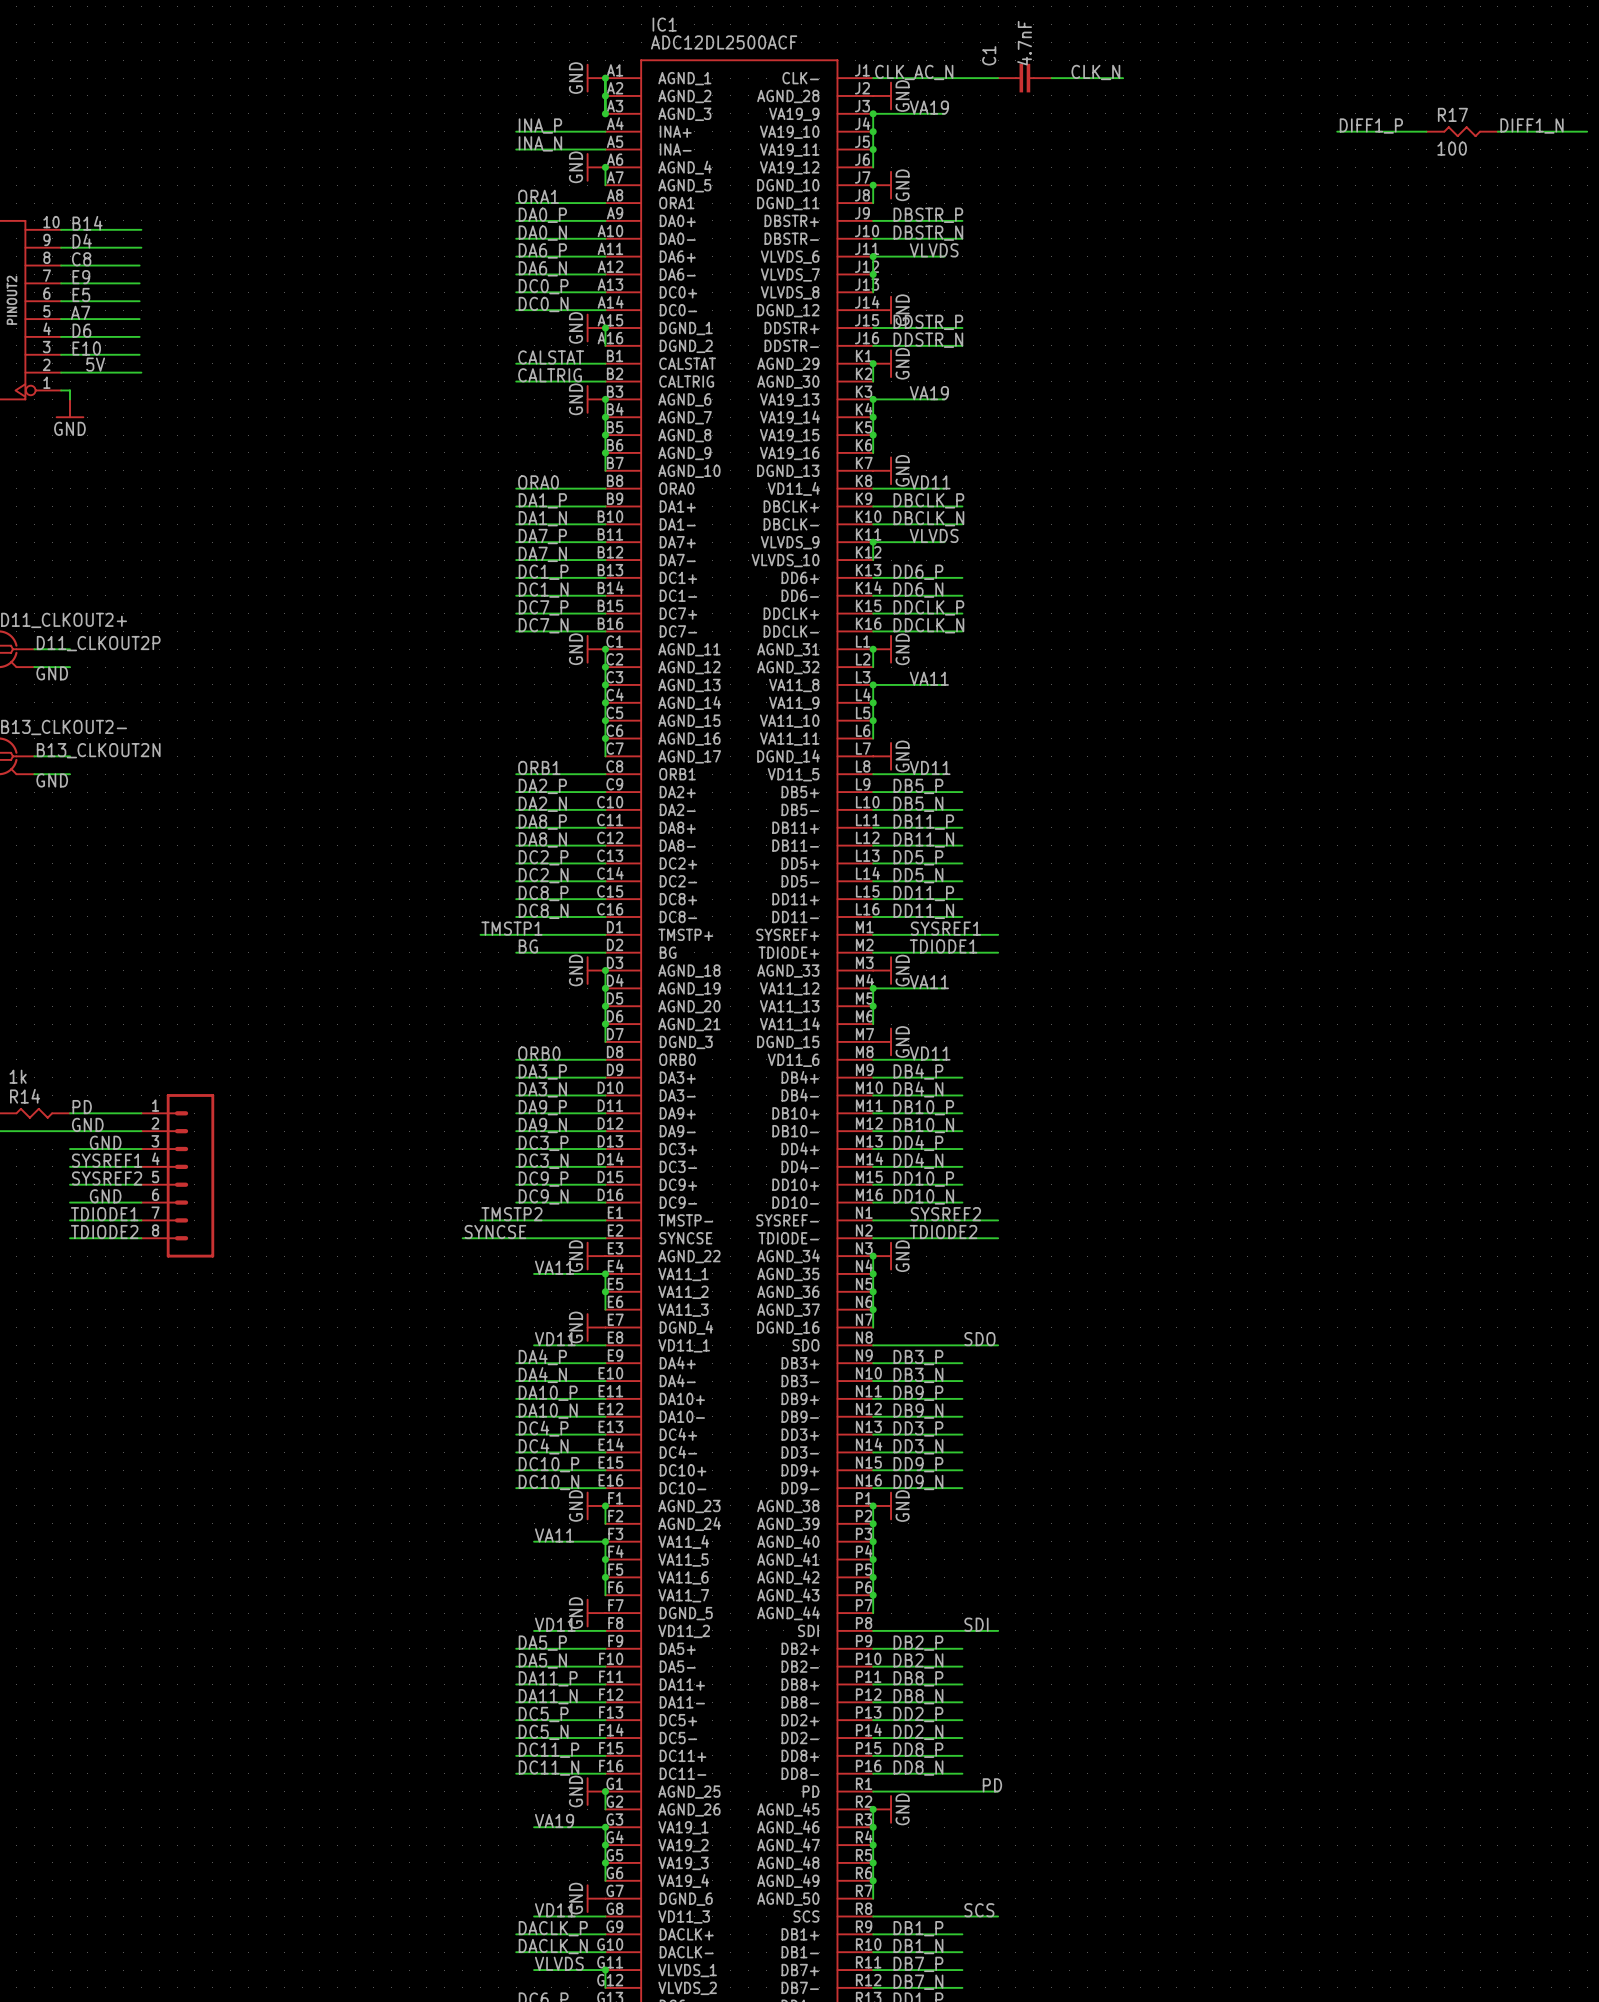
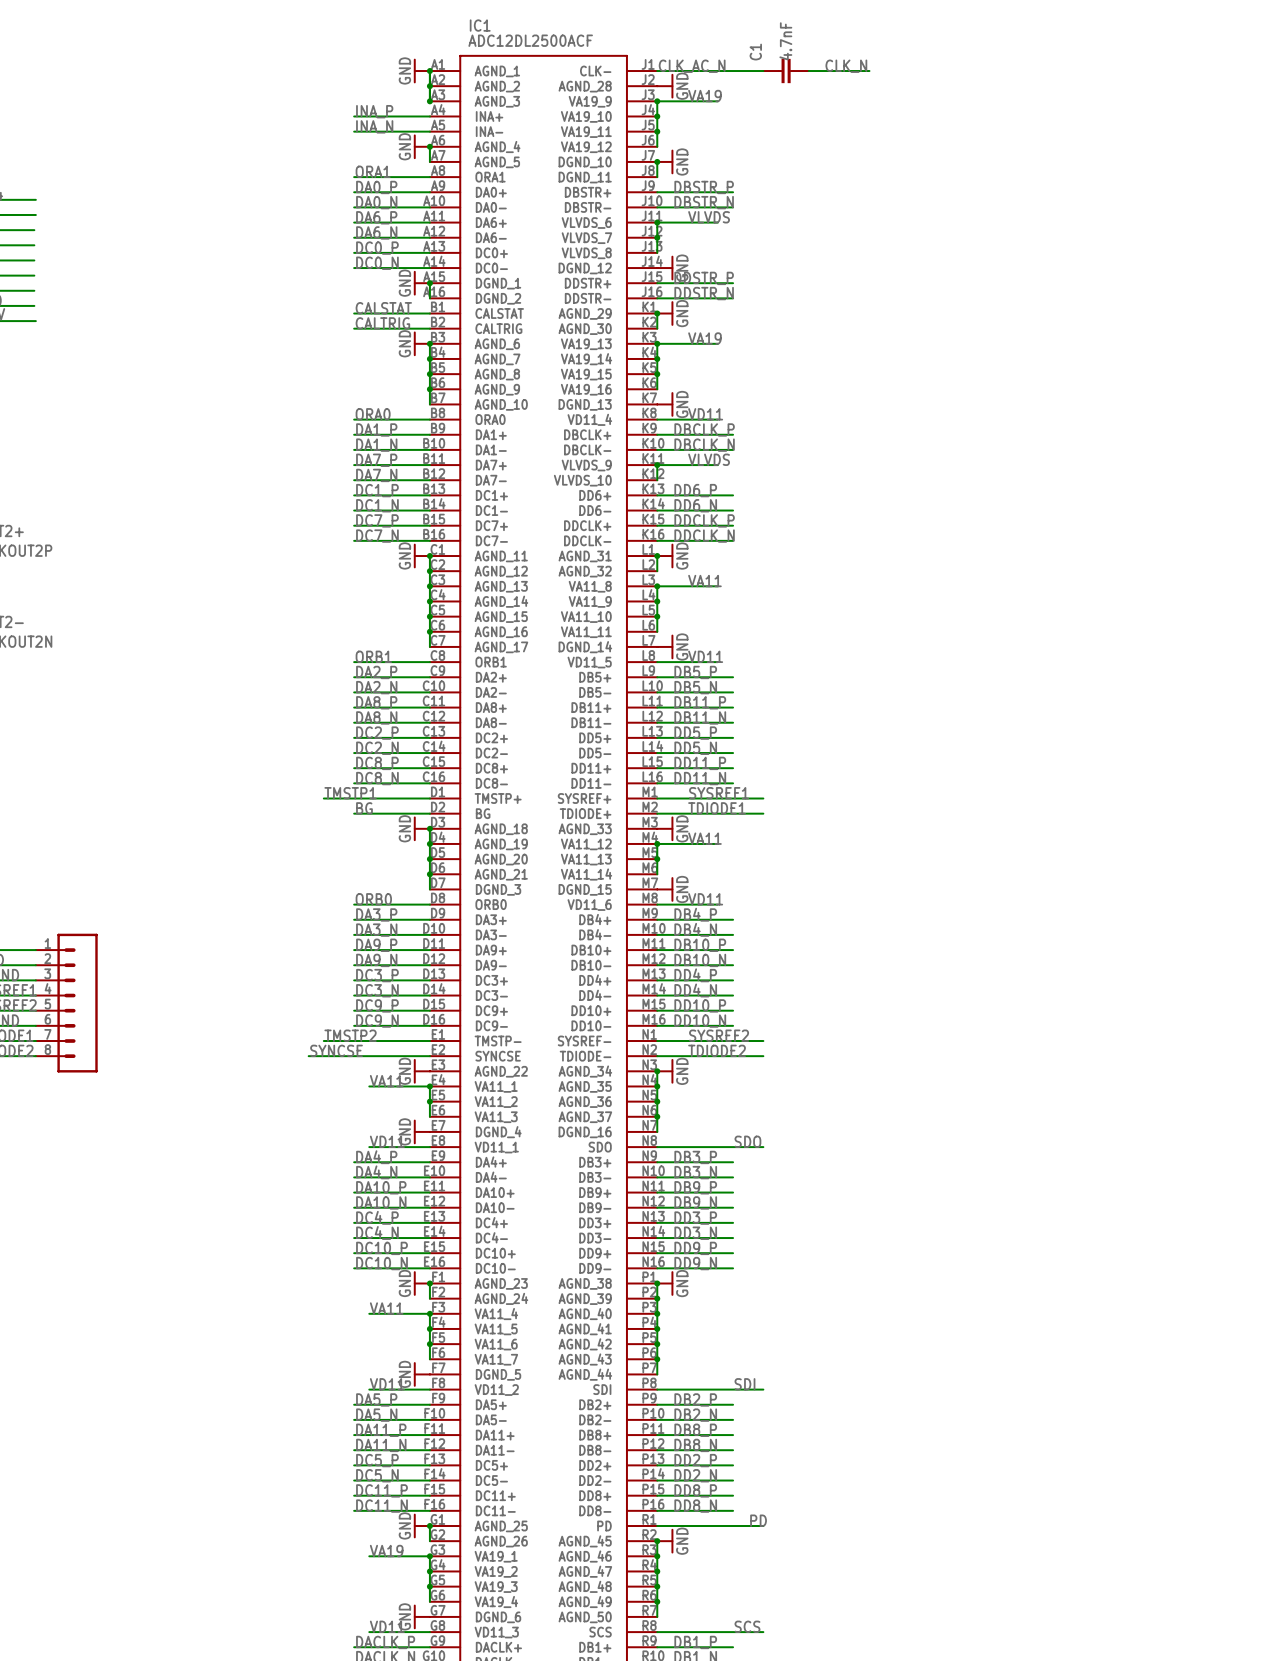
label: DIFF1_P (1371, 126) -> none
label: DIFF1_N (1531, 126) -> none
wire: (1337, 131) (1426, 131) -> none
R17: 100 (1462, 131) -> none
wire: (1497, 131) (1587, 131) -> none

